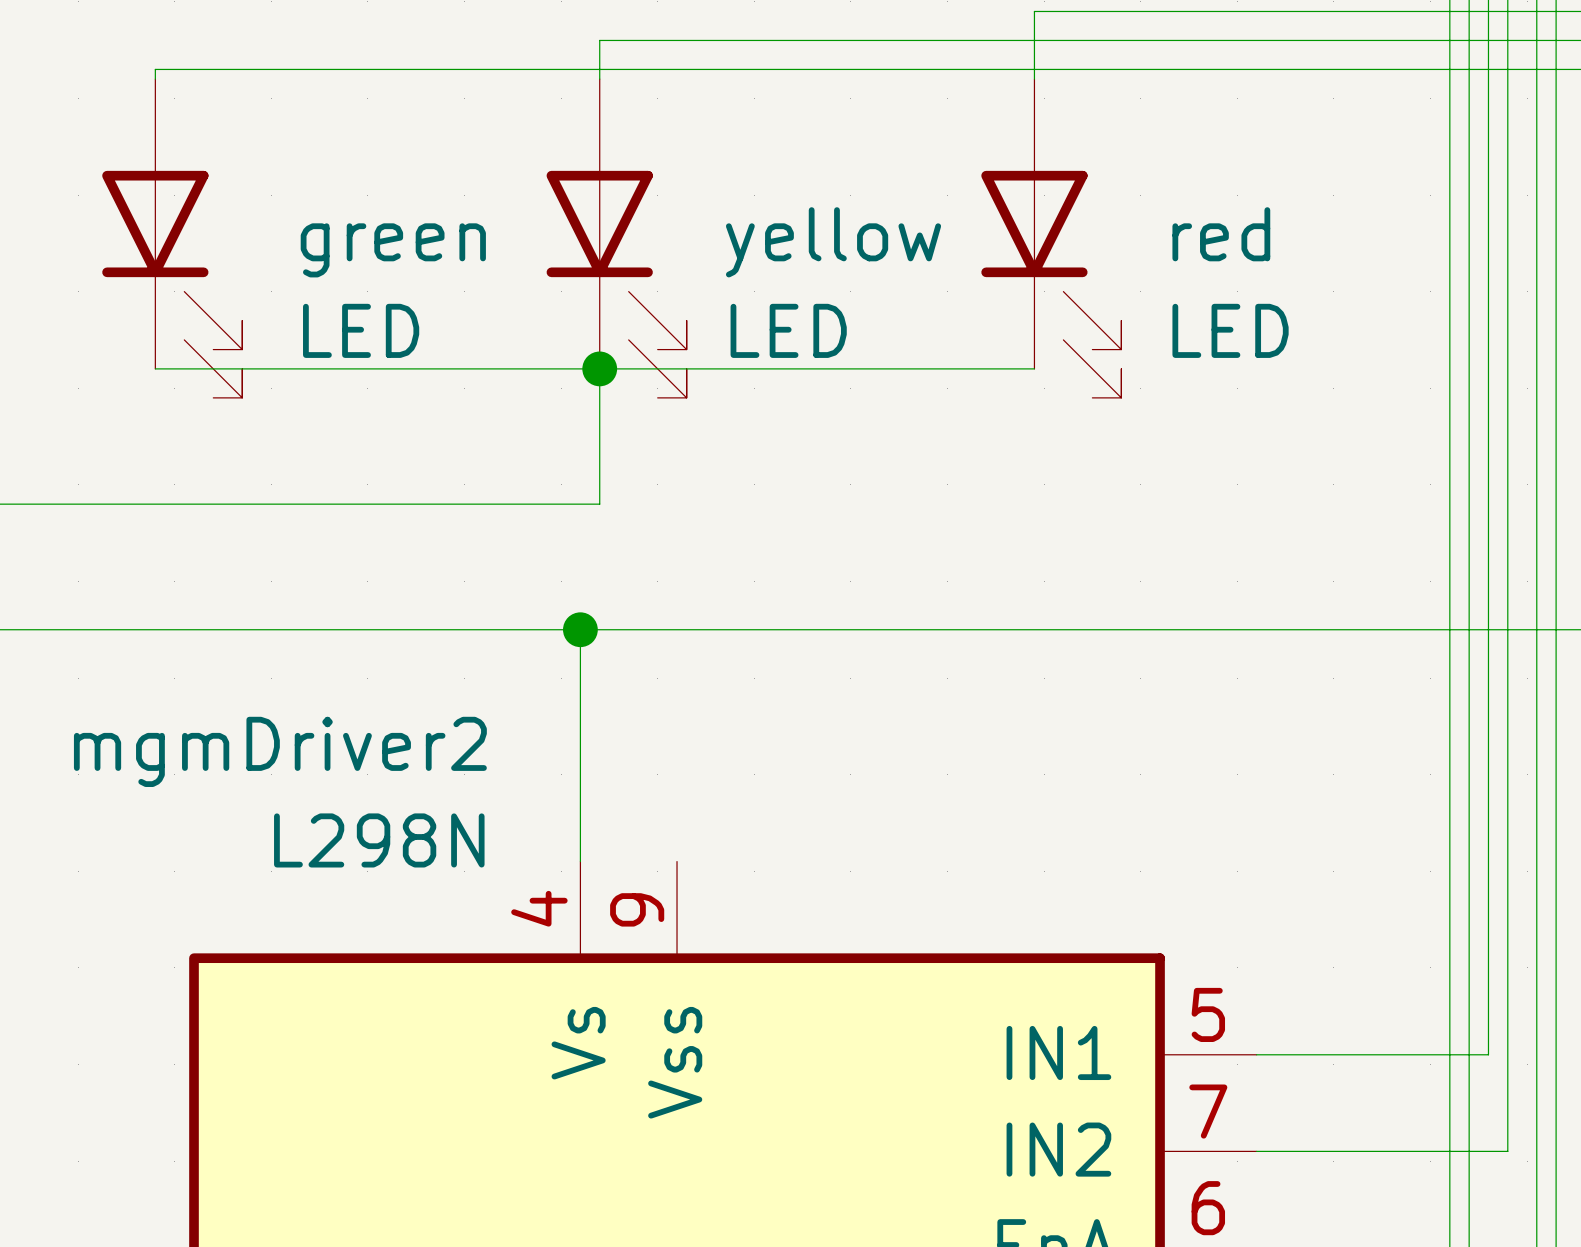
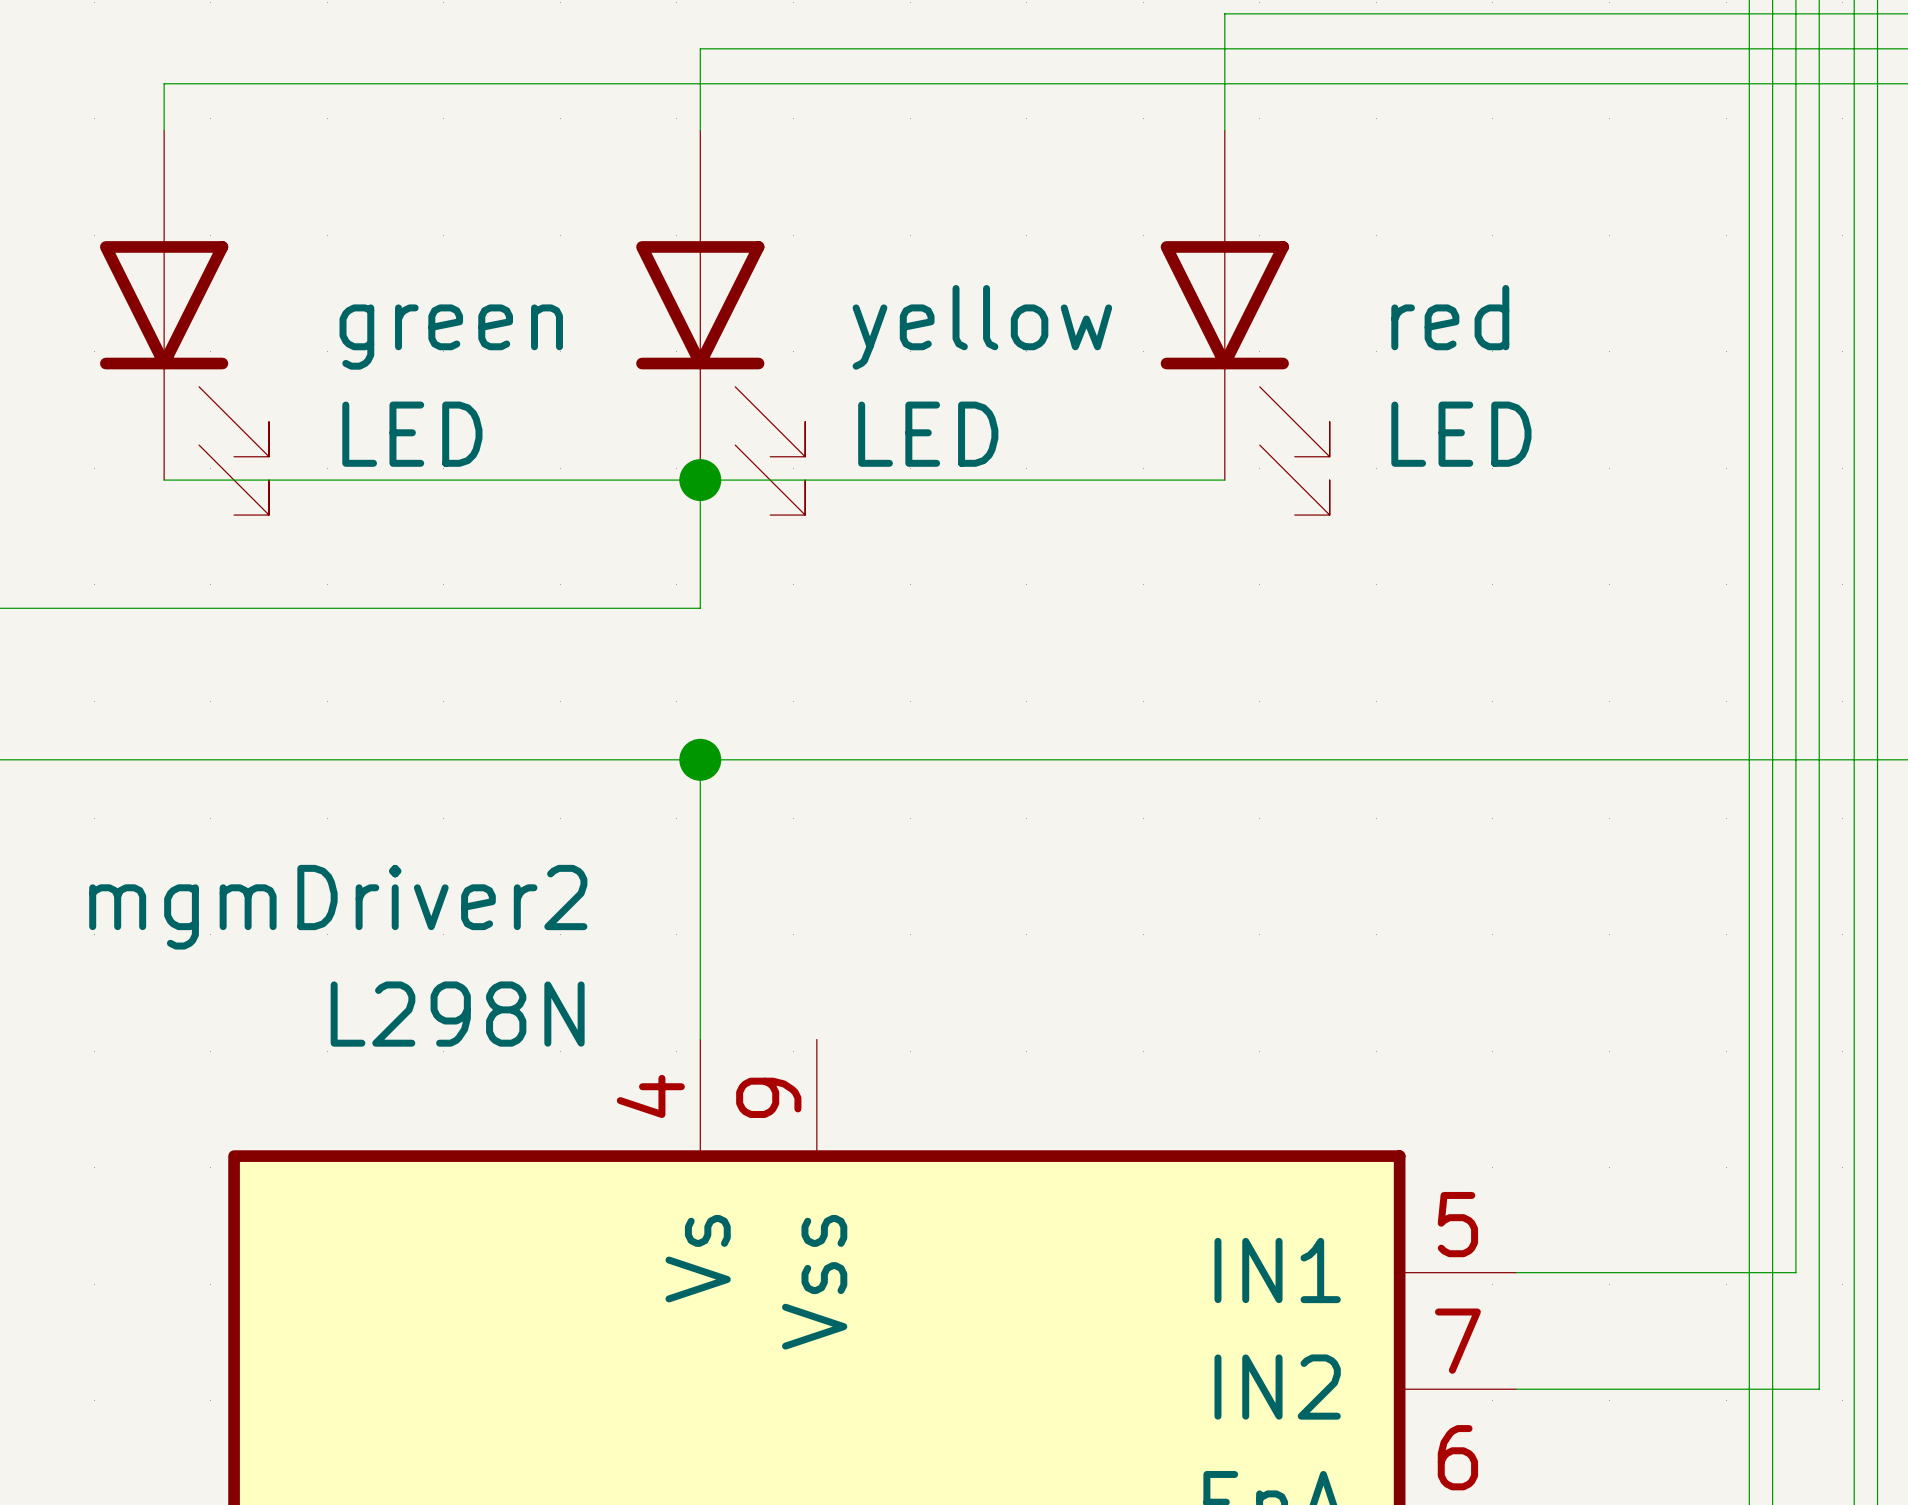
wire: (1034, 11) (1034, 79) -> (1248, 13) (1224, 13) (1224, 130)
wire: (599, 40) (599, 79) -> (723, 48) (700, 48) (700, 130)
wire: (155, 69) (155, 79) -> (187, 83) (164, 83) (164, 130)
green position: (172, 238) -> (184, 322)
yellow position: (616, 238) -> (720, 322)
red position: (1051, 238) -> (1245, 322)
wire: (155, 368) (1034, 368) -> (164, 480) (1224, 480)
wire: (599, 368) (599, 504) (580, 504) -> (700, 480) (700, 608)
junction position: (599, 368) -> (700, 480)

